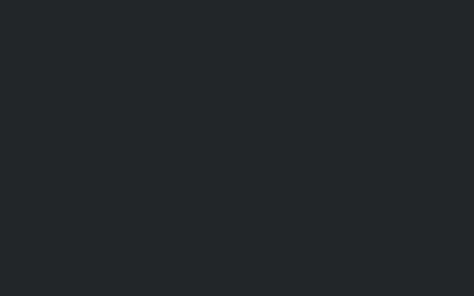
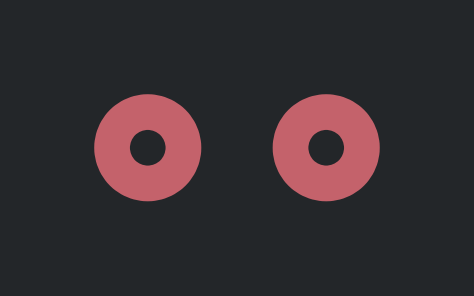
part: none -> (147, 147)
part: none -> (326, 147)

